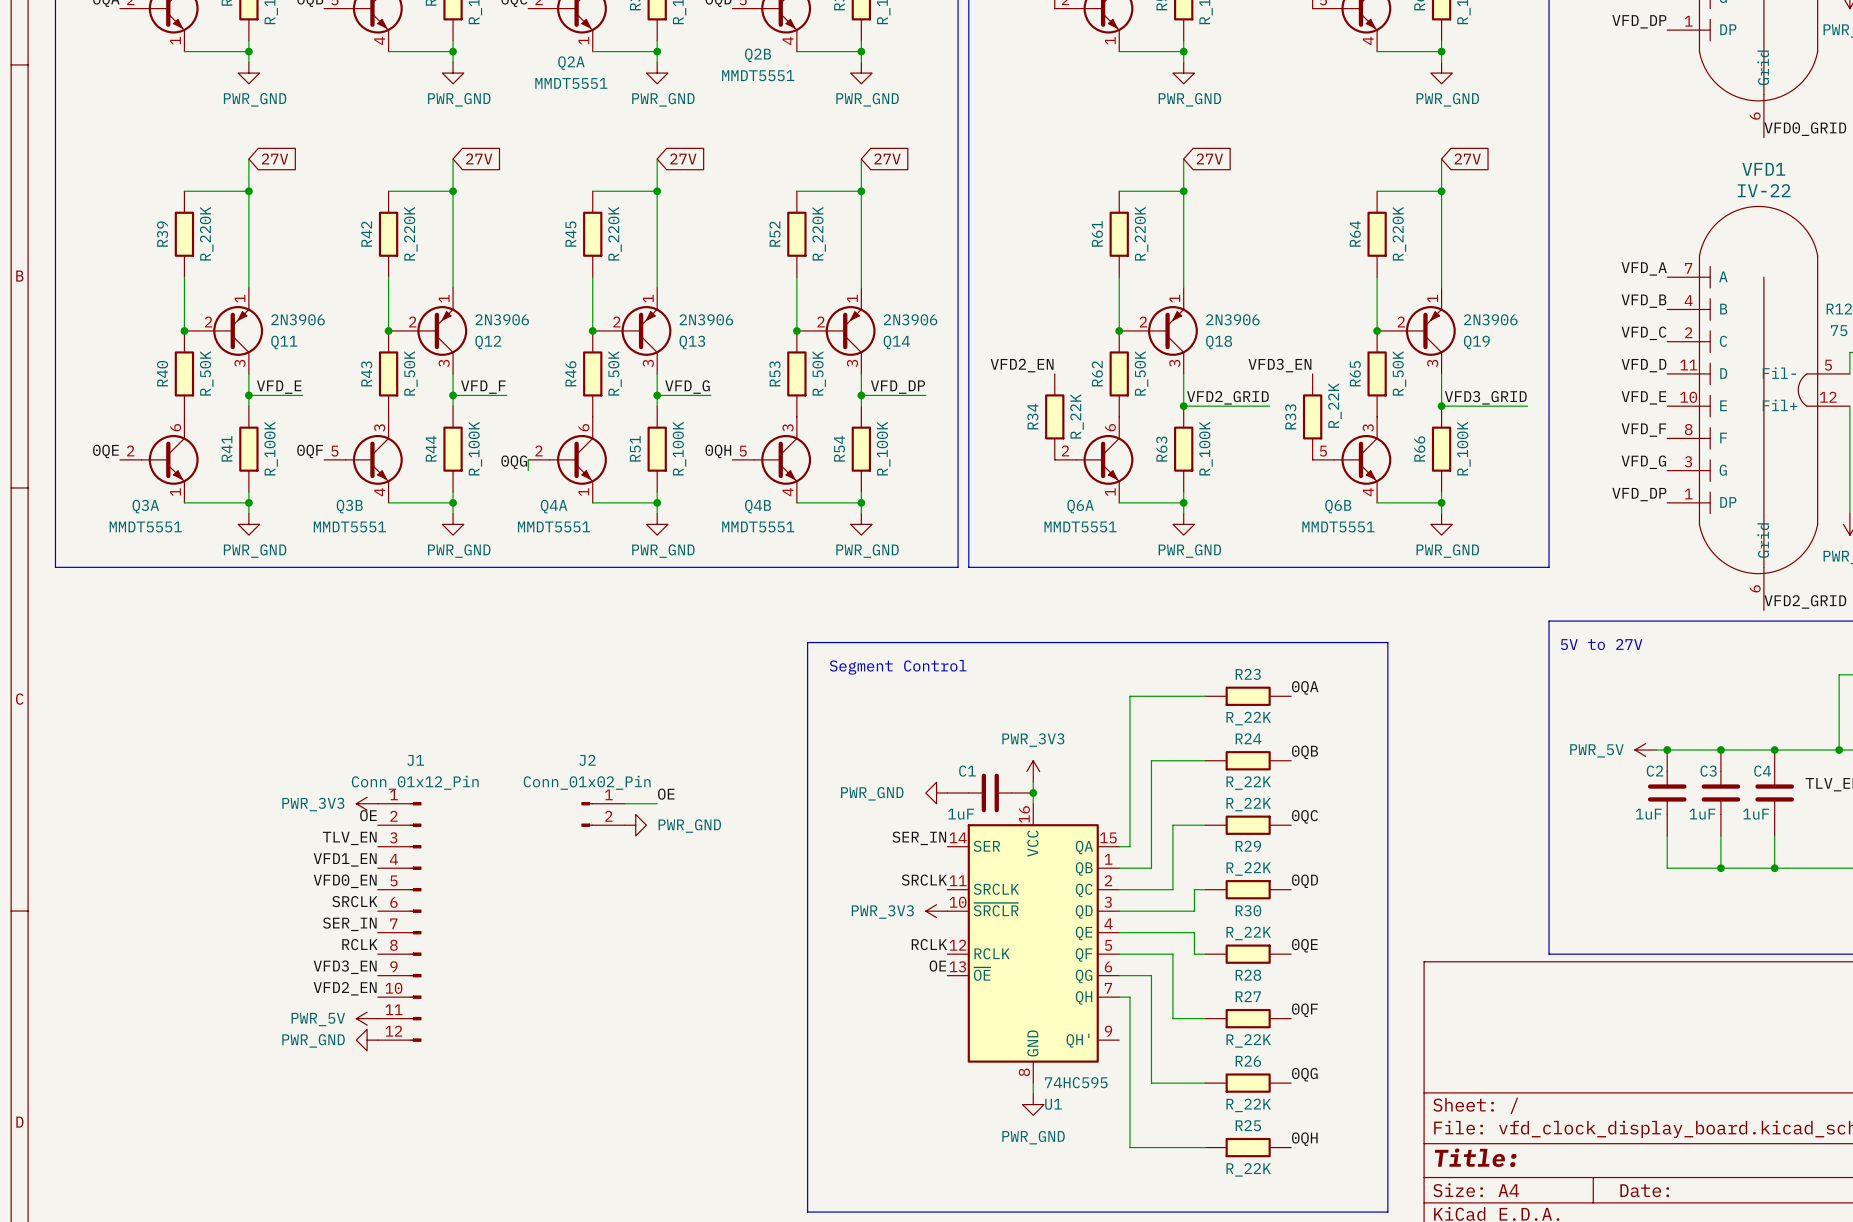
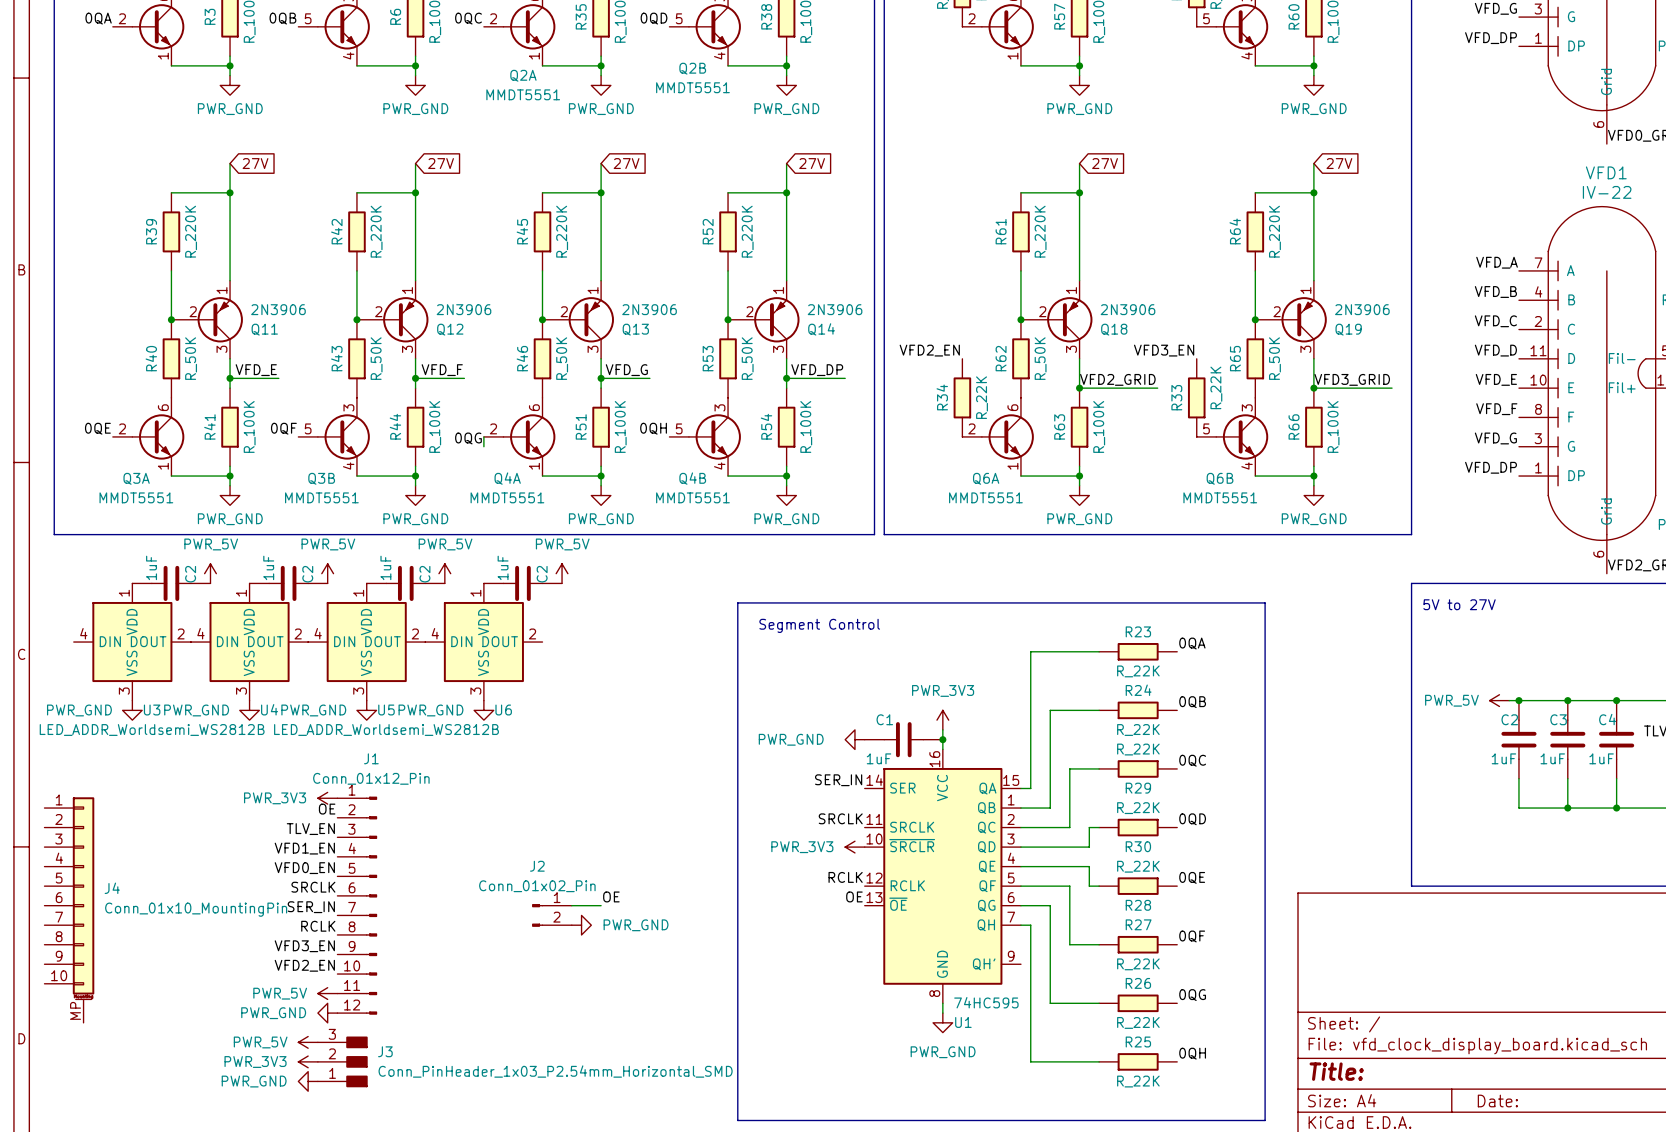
power symbol: none -> PWR_5V (210, 573)
power symbol: none -> PWR_5V (327, 573)
power symbol: none -> PWR_5V (444, 573)
power symbol: none -> PWR_5V (562, 573)
C2: none -> 1uF (171, 583)
C2: none -> 1uF (288, 583)
C2: none -> 1uF (405, 583)
C2: none -> 1uF (522, 583)
U3: none -> LED_ADDR_Worldsemi_WS2812B (132, 642)
U4: none -> (249, 642)
U5: none -> LED_ADDR_Worldsemi_WS2812B (366, 642)
U6: none -> (483, 642)
power symbol: none -> PWR_GND (132, 710)
power symbol: none -> PWR_GND (249, 710)
power symbol: none -> PWR_GND (366, 710)
power symbol: none -> PWR_GND (483, 710)
label: OE (666, 794) -> none
power symbol position: PWR_3V3 (367, 803) -> PWR_3V3 (327, 798)
wire: (624, 803) (657, 803) -> (571, 905) (601, 905)
J2 position: (603, 814) -> (551, 915)
label position: OE (368, 815) -> OE (327, 809)
power symbol: PWR_GND (635, 825) -> none
label position: TLV_EN (349, 838) -> TLV_EN (310, 829)
label position: VFD1_EN (345, 859) -> VFD1_EN (304, 848)
label position: VFD0_EN (345, 881) -> VFD0_EN (304, 868)
label position: SRCLK (354, 901) -> SRCLK (313, 887)
J1 position: (399, 921) -> (357, 905)
label position: SER_IN (349, 924) -> SER_IN (311, 907)
label position: RCLK (359, 944) -> RCLK (318, 926)
label: none -> OE (611, 896)
label position: VFD3_EN (345, 967) -> VFD3_EN (304, 946)
J4: none -> Conn_01x10_MountingPin (69, 910)
label position: VFD2_EN (345, 988) -> VFD2_EN (304, 965)
power symbol: none -> PWR_GND (581, 925)
power symbol position: PWR_5V (367, 1018) -> PWR_5V (327, 993)
power symbol position: PWR_GND (367, 1040) -> PWR_GND (327, 1013)
power symbol: none -> PWR_5V (308, 1042)
power symbol: none -> PWR_3V3 (308, 1061)
J3: none -> Conn_PinHeader_1x03_P2.54mm_Horizontal_SMD (342, 1061)
power symbol: none -> PWR_GND (308, 1081)

